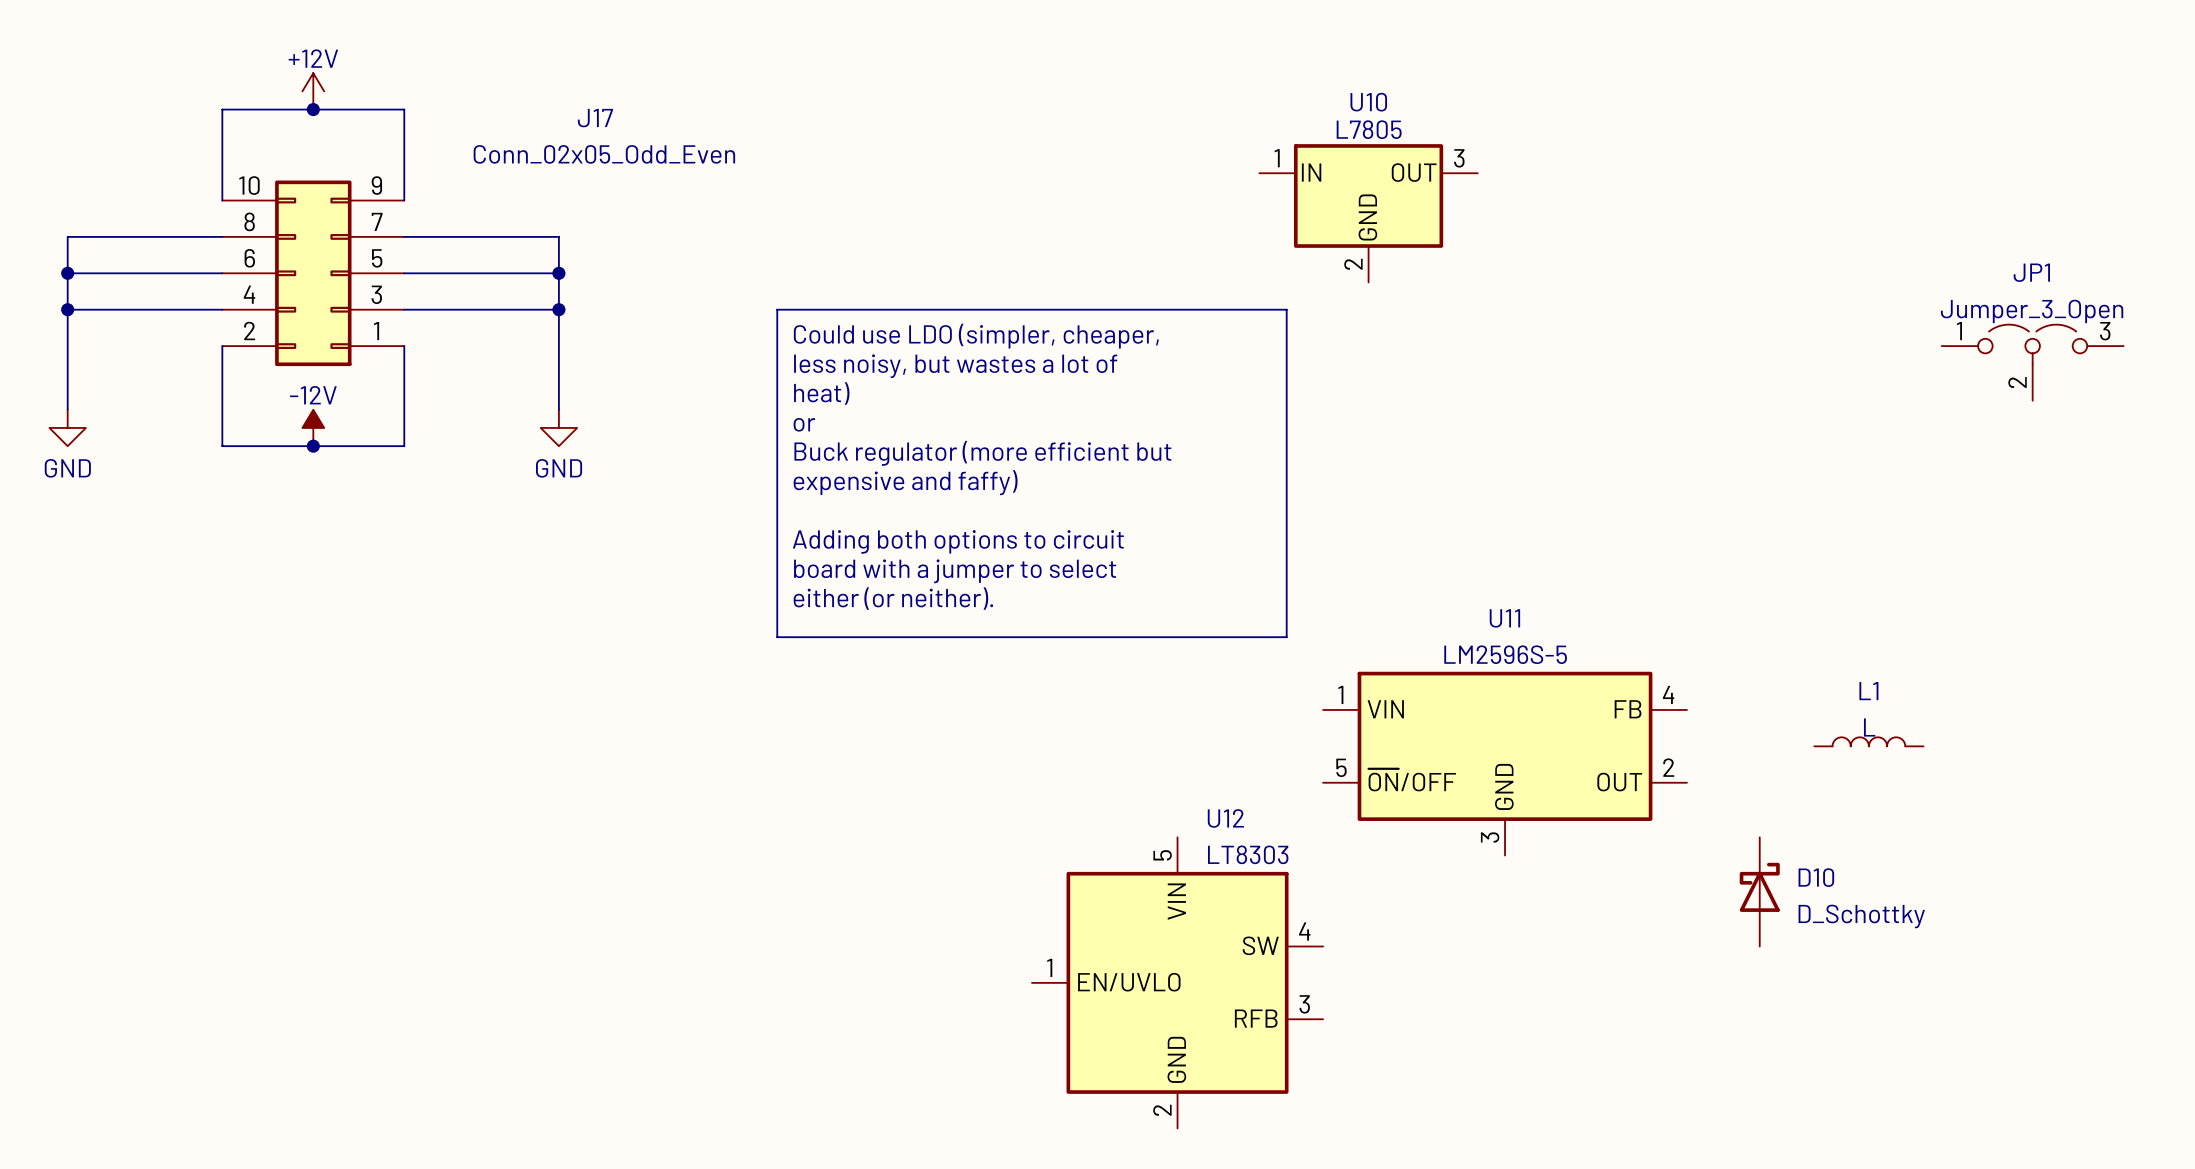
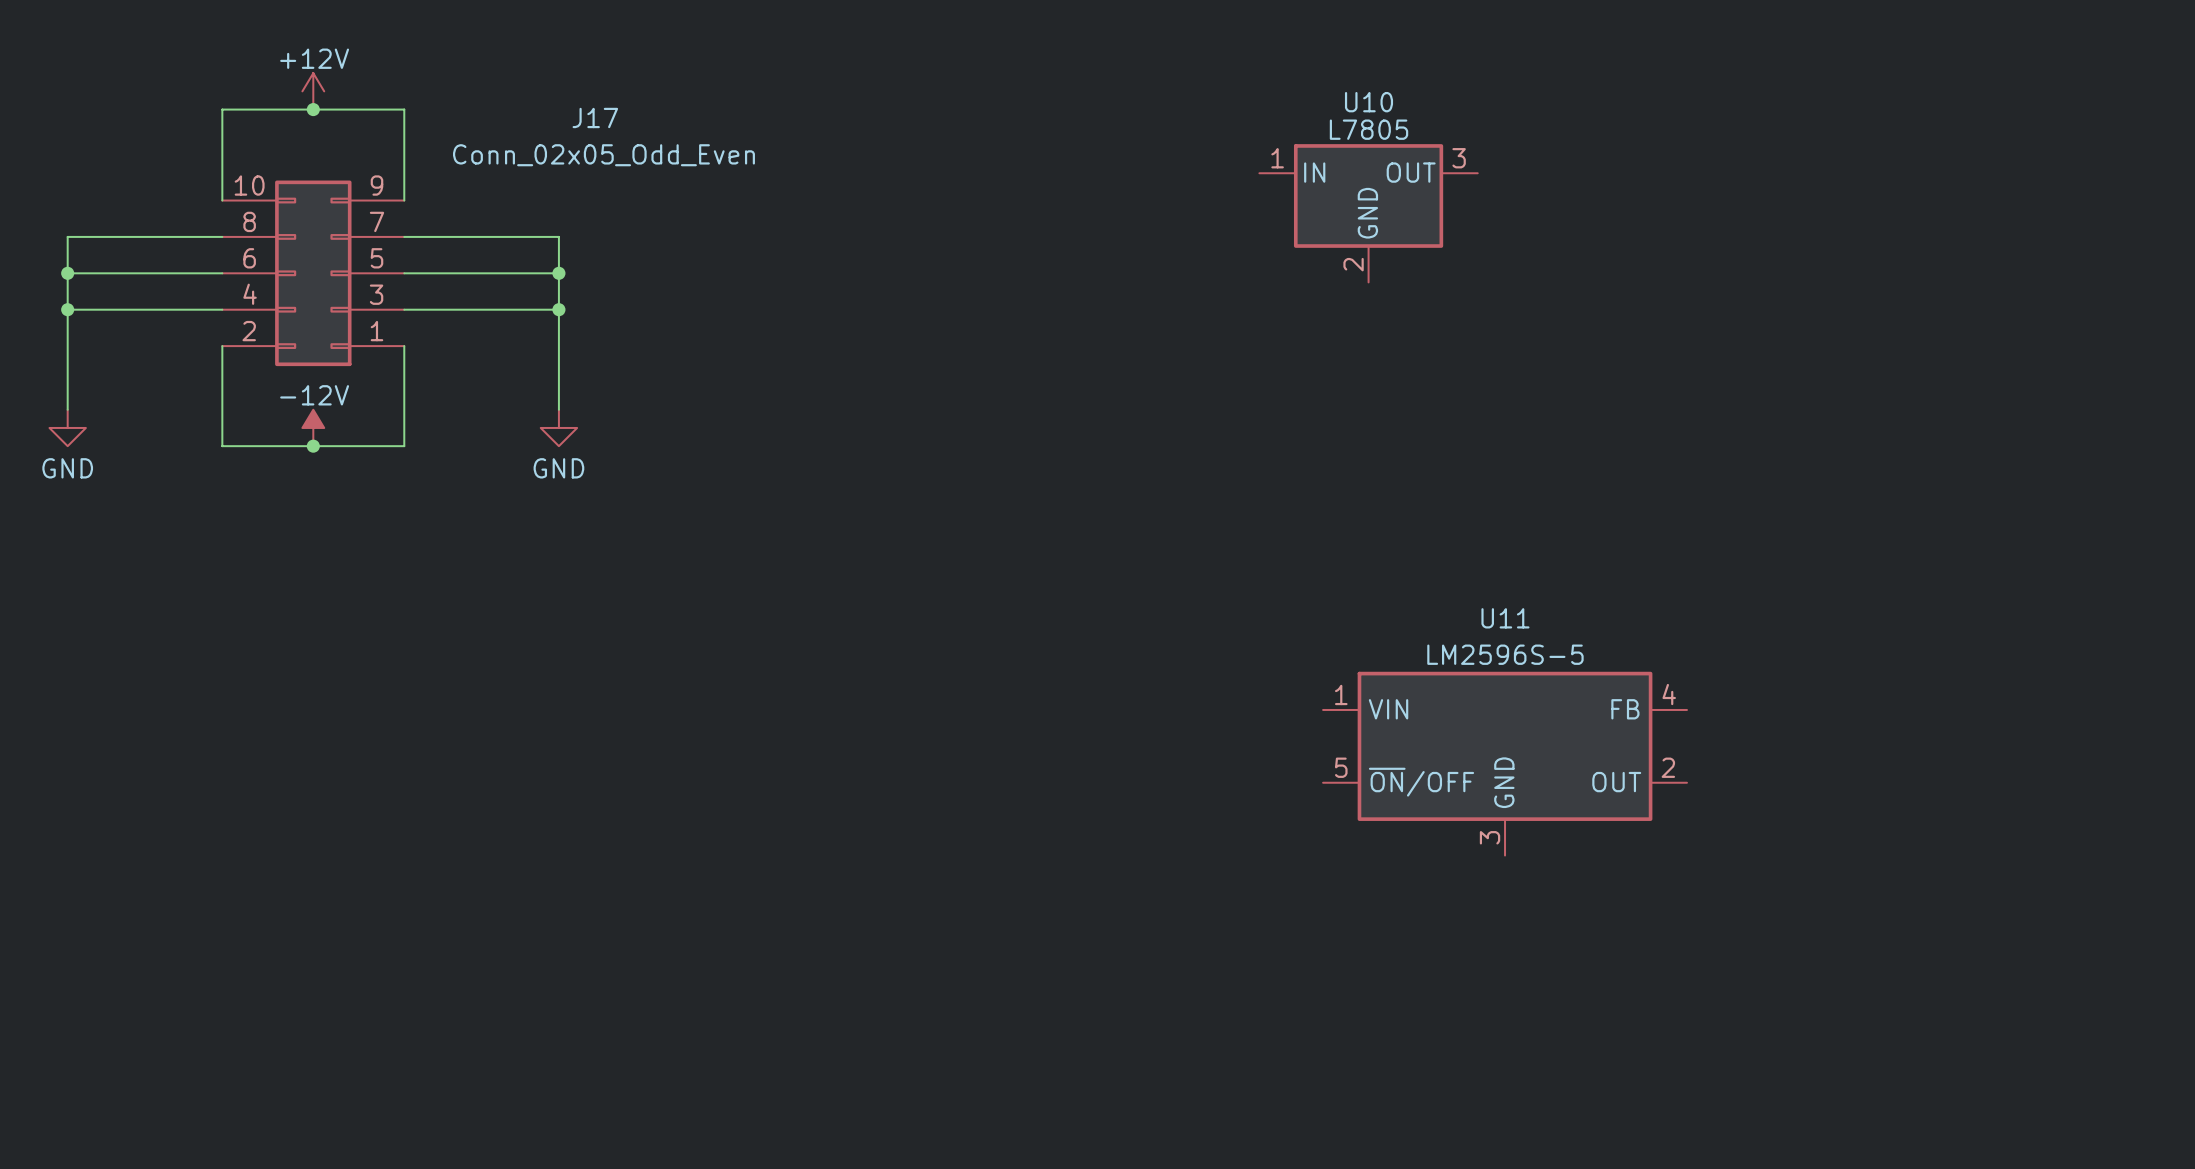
line: (777, 309) (1286, 309) (1286, 637) (777, 637) (777, 309) -> none
text: Could use LDO (simpler, cheaper, (976, 336) -> none
JP1: Jumper_3_Open (2032, 362) -> none
text: less noisy, but wastes a lot of (955, 366) -> none
text: heat) (821, 393) -> none
text: or (804, 424) -> none
text: Buck regulator (more efficient but (982, 453) -> none
text: expensive and faffy) (905, 482) -> none
text: Adding both options to circuit (958, 541) -> none
text: board with a jumper to select (955, 571) -> none
text: either (or neither). (893, 598) -> none
L1: L (1868, 741) -> none
D10: D_Schottky (1759, 891) -> none
U12: LT8303 (1177, 982) -> none

